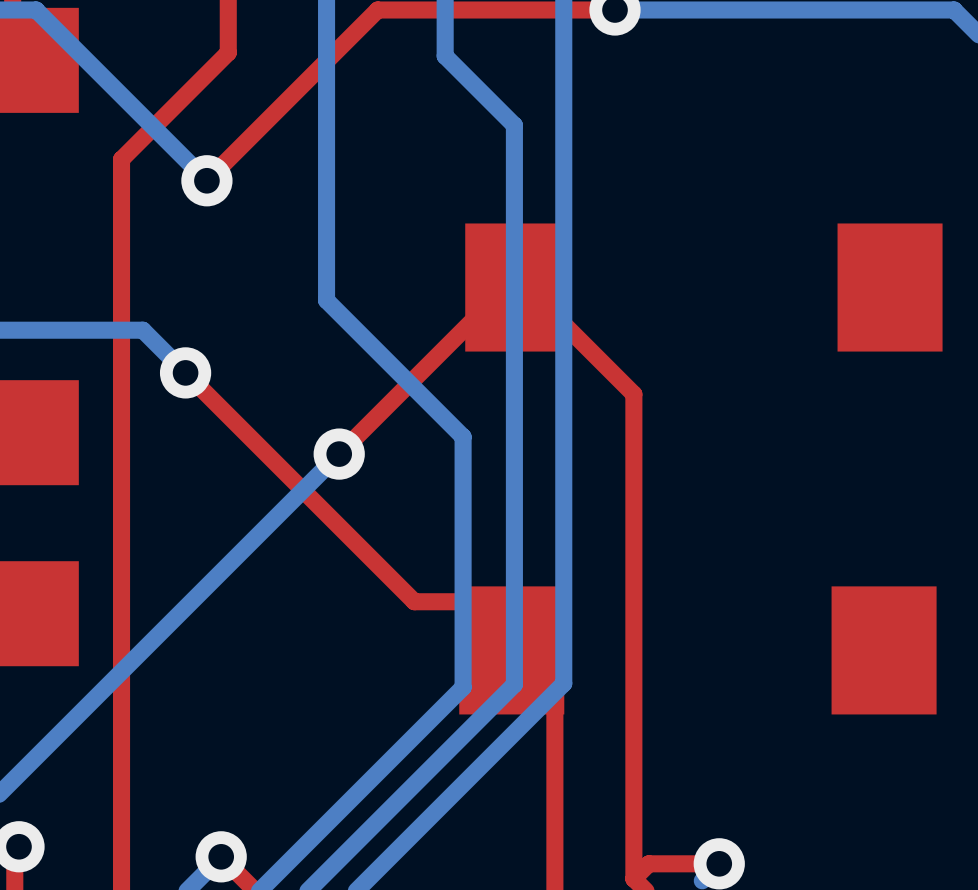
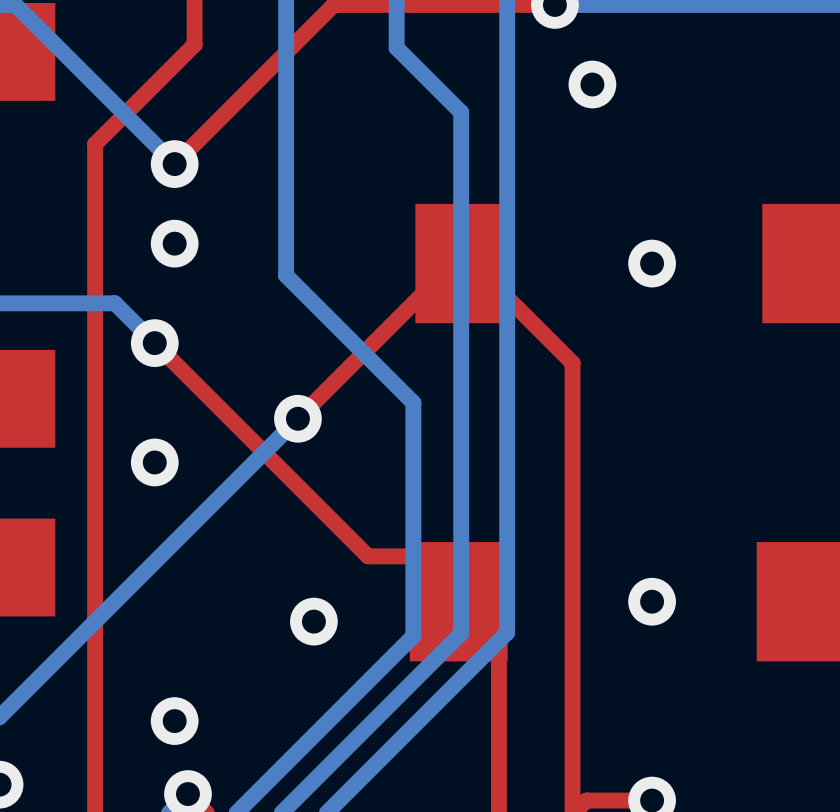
via: none -> (592, 84)
via: none -> (174, 243)
via: none -> (652, 263)
via: none -> (154, 462)
via: none -> (652, 601)
via: none -> (313, 621)
via: none -> (174, 721)

